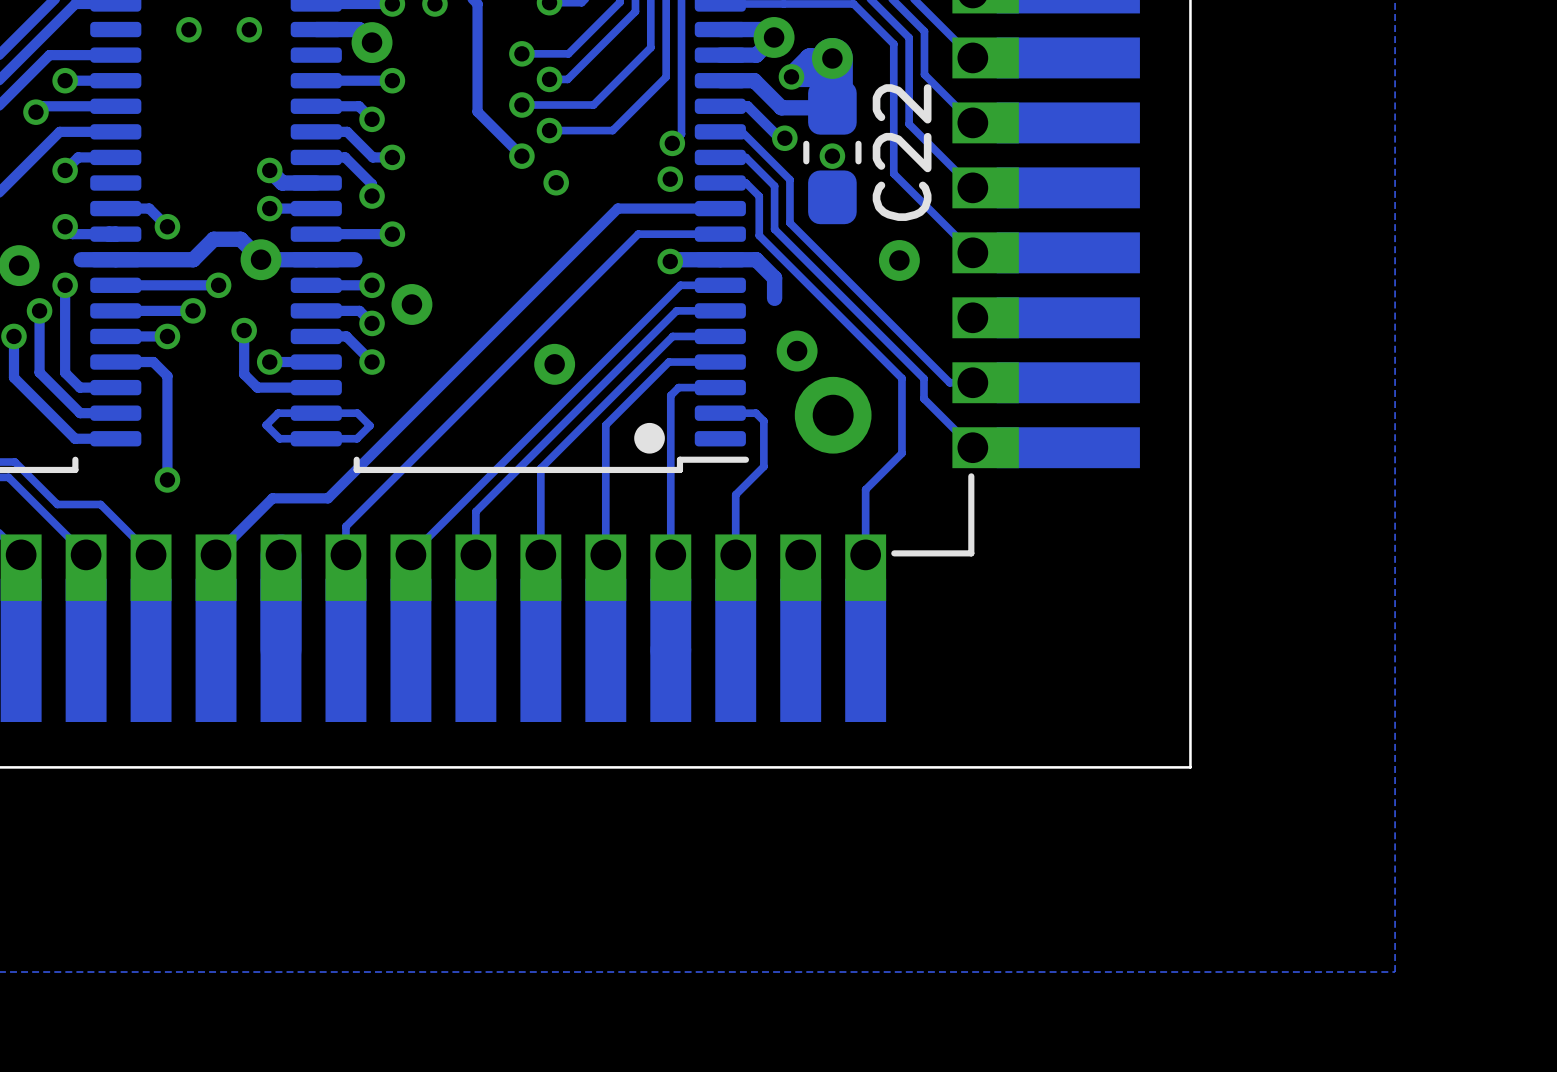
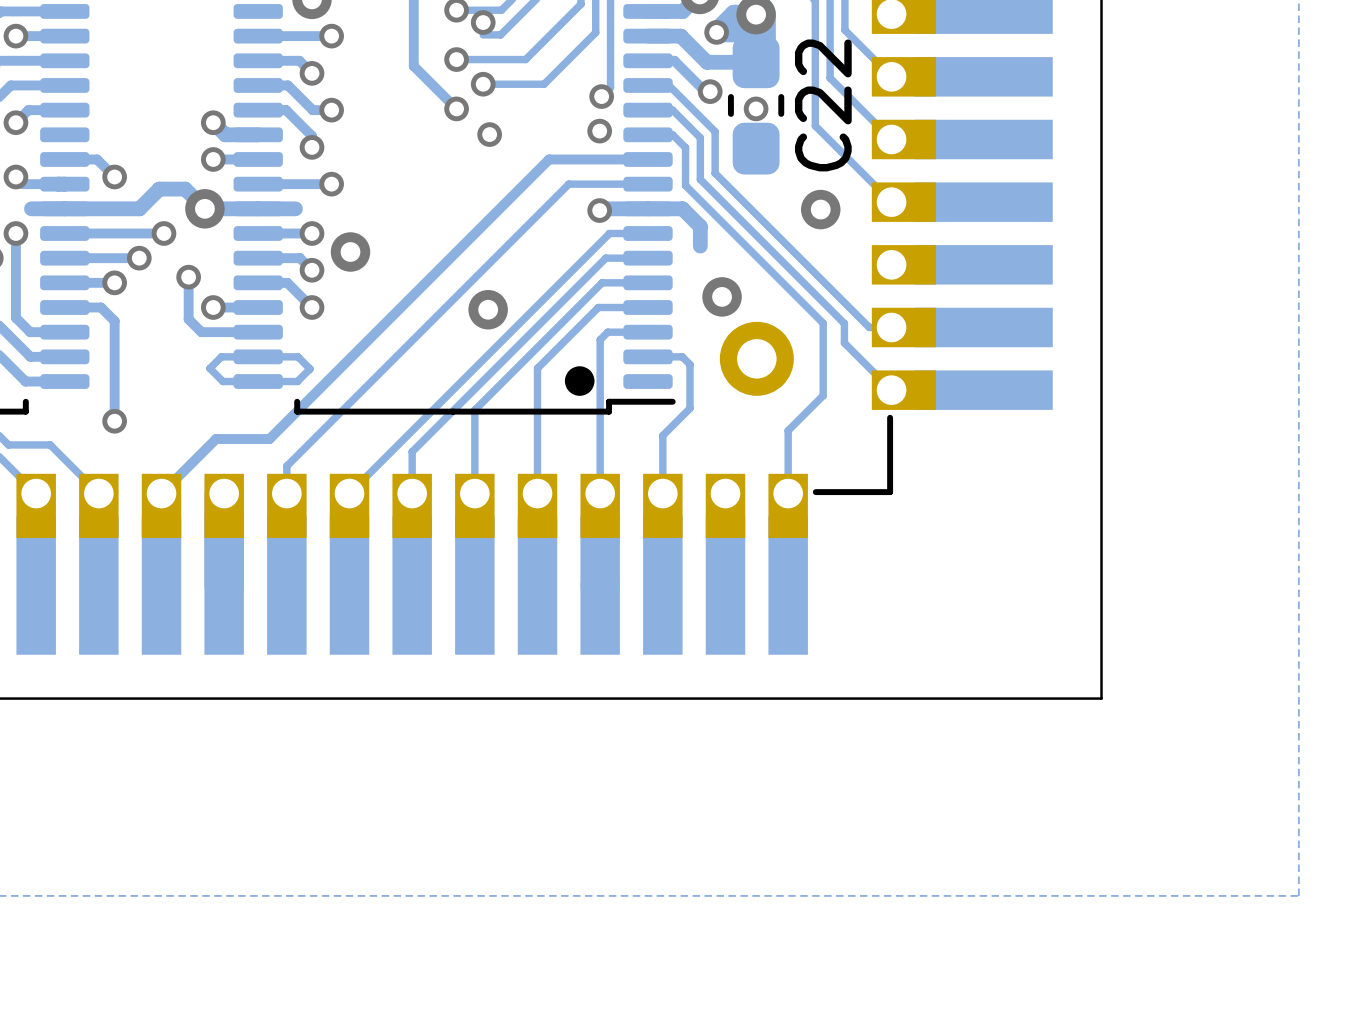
via position: (549, 79) -> (483, 22)

